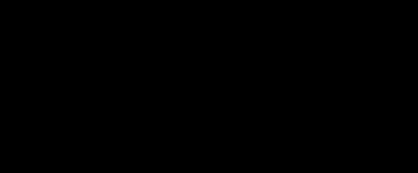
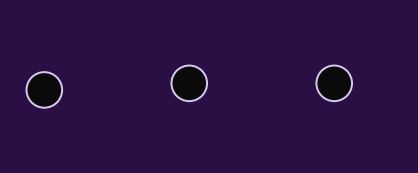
part: none -> (189, 83)
part: none -> (334, 83)
part: none -> (44, 89)

